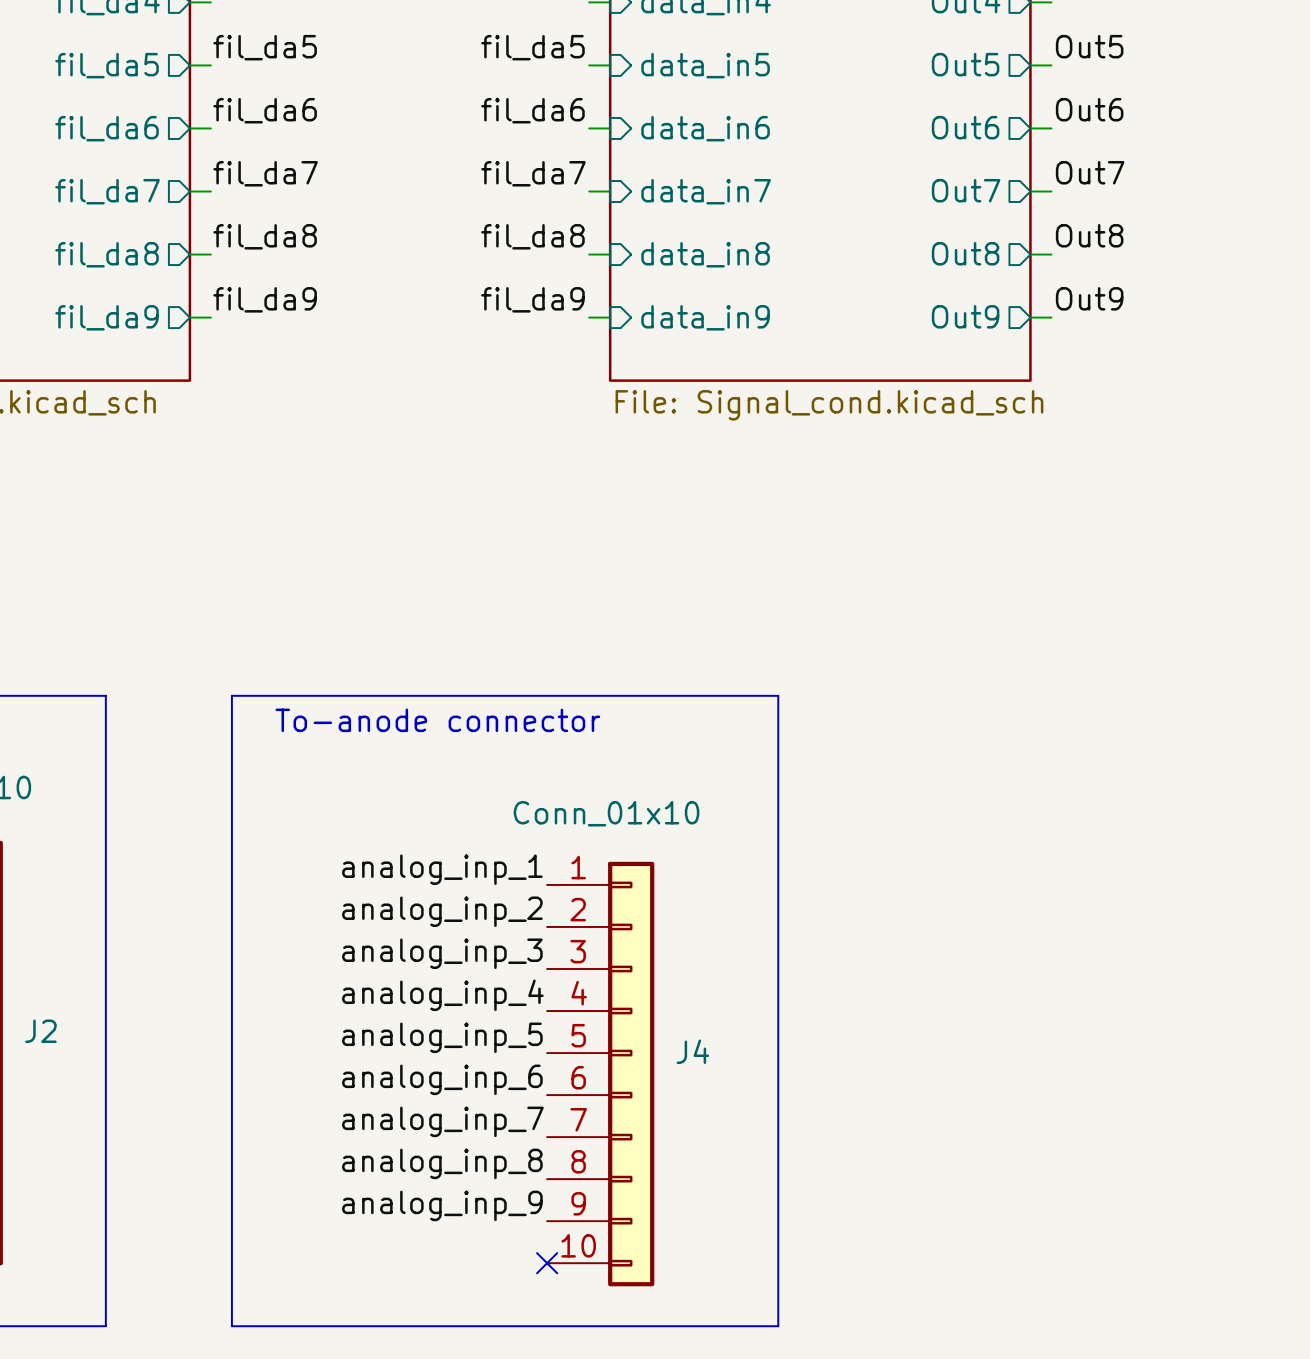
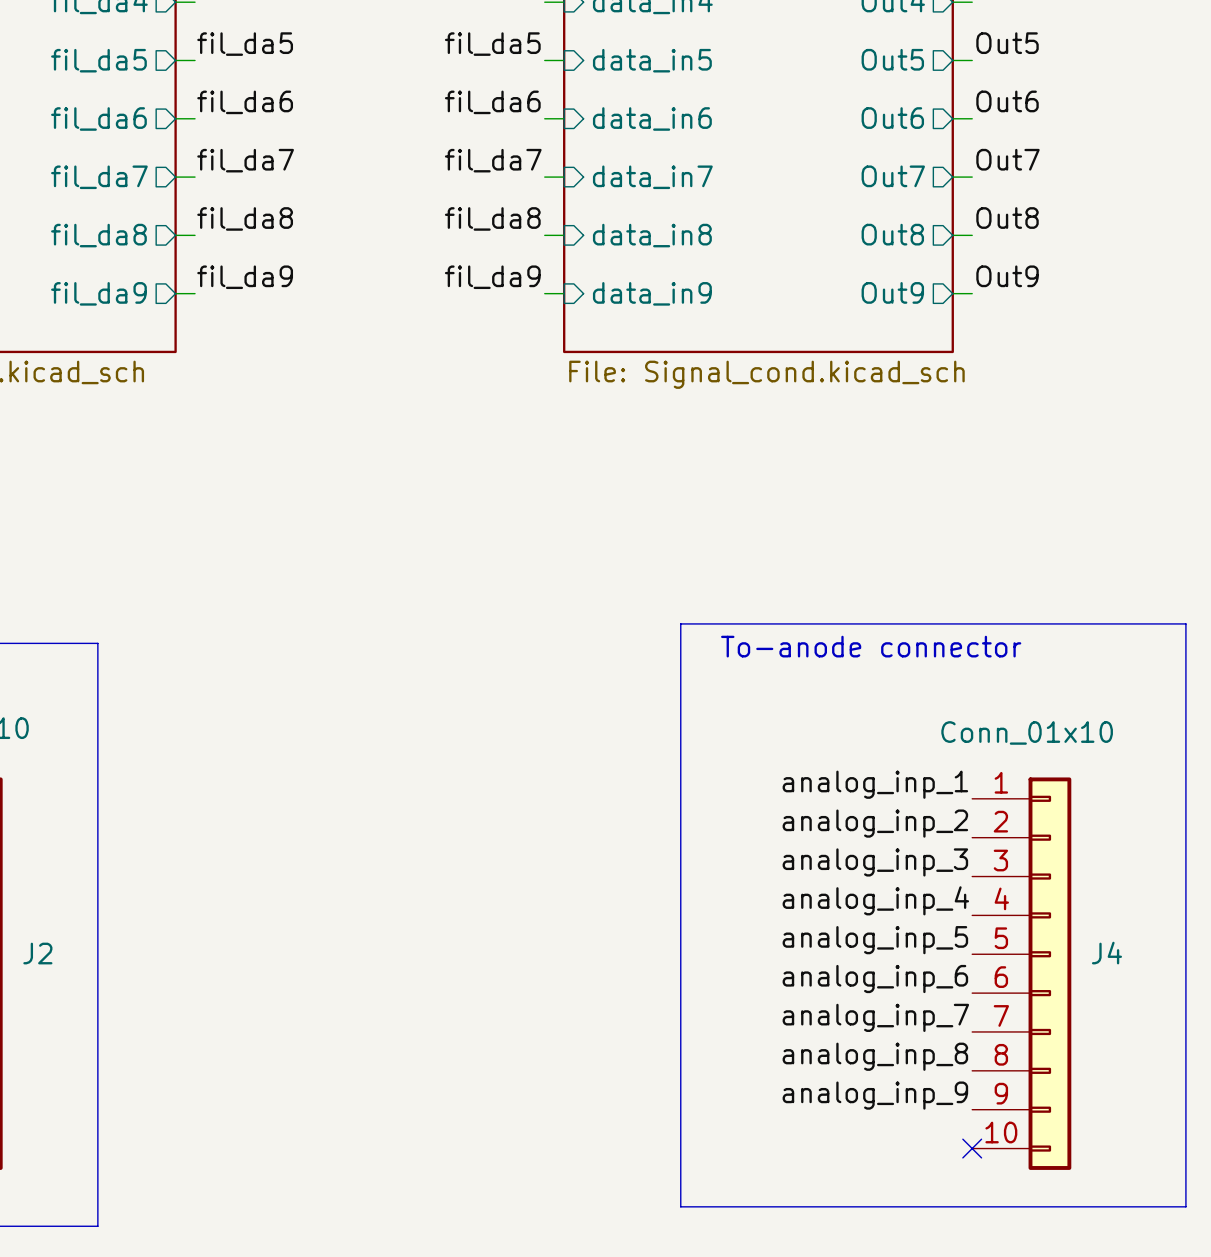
line: none -> (680, 623) (1185, 623) (1185, 1206) (680, 1206) (680, 623)
line: (231, 695) (778, 695) (778, 1326) (231, 1326) (231, 695) -> none
text: none -> To-anode connector (871, 646)
text: To-anode connector (437, 720) -> none
label: none -> analog_inp_1 (875, 784)
label: analog_inp_1 (442, 869) -> none
label: none -> analog_inp_2 (875, 823)
label: analog_inp_2 (442, 911) -> none
label: none -> analog_inp_3 (875, 862)
label: analog_inp_3 (442, 953) -> none
label: none -> analog_inp_4 (875, 900)
label: analog_inp_4 (442, 995) -> none
label: none -> analog_inp_5 (875, 940)
label: analog_inp_5 (442, 1037) -> none
label: none -> analog_inp_6 (875, 979)
J4 position: (600, 1074) -> (1021, 973)
label: analog_inp_6 (442, 1079) -> none
label: none -> analog_inp_7 (875, 1017)
label: analog_inp_7 (442, 1121) -> none
label: none -> analog_inp_8 (875, 1056)
label: analog_inp_8 (442, 1163) -> none
label: none -> analog_inp_9 (875, 1095)
label: analog_inp_9 (442, 1205) -> none
no-connect mark: none -> (972, 1148)
no-connect mark: (547, 1263) -> none

